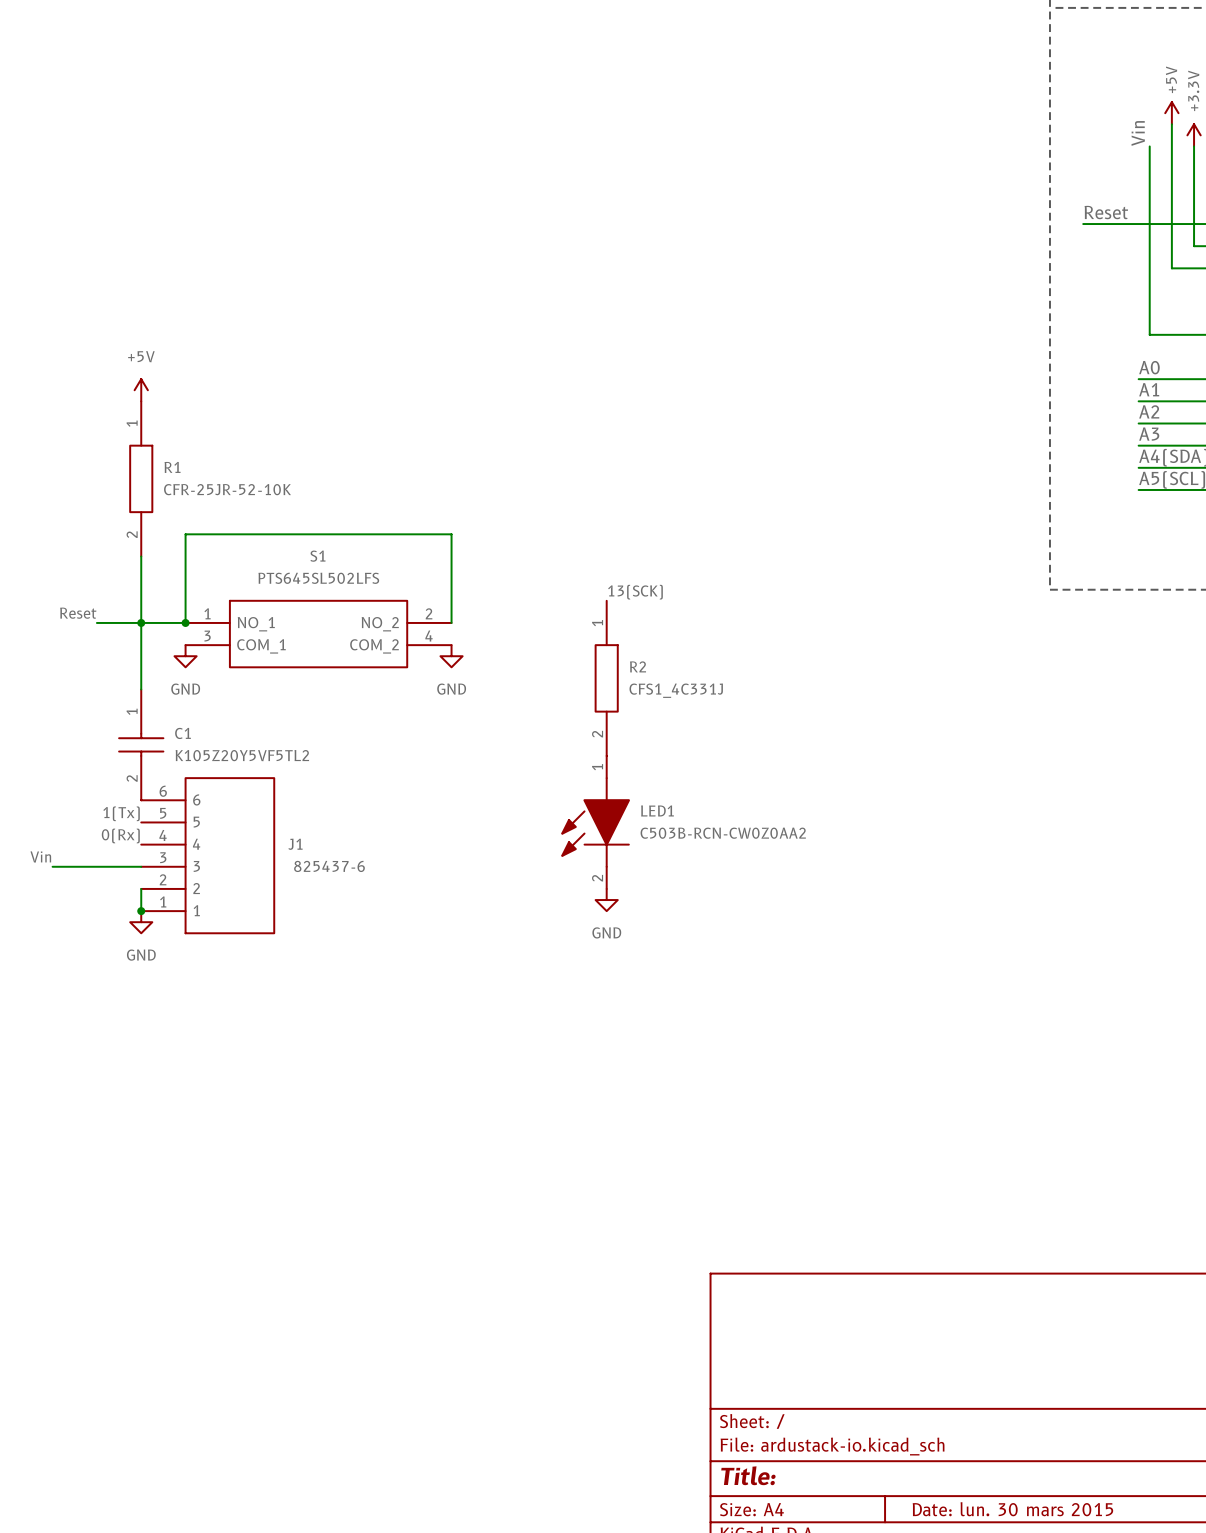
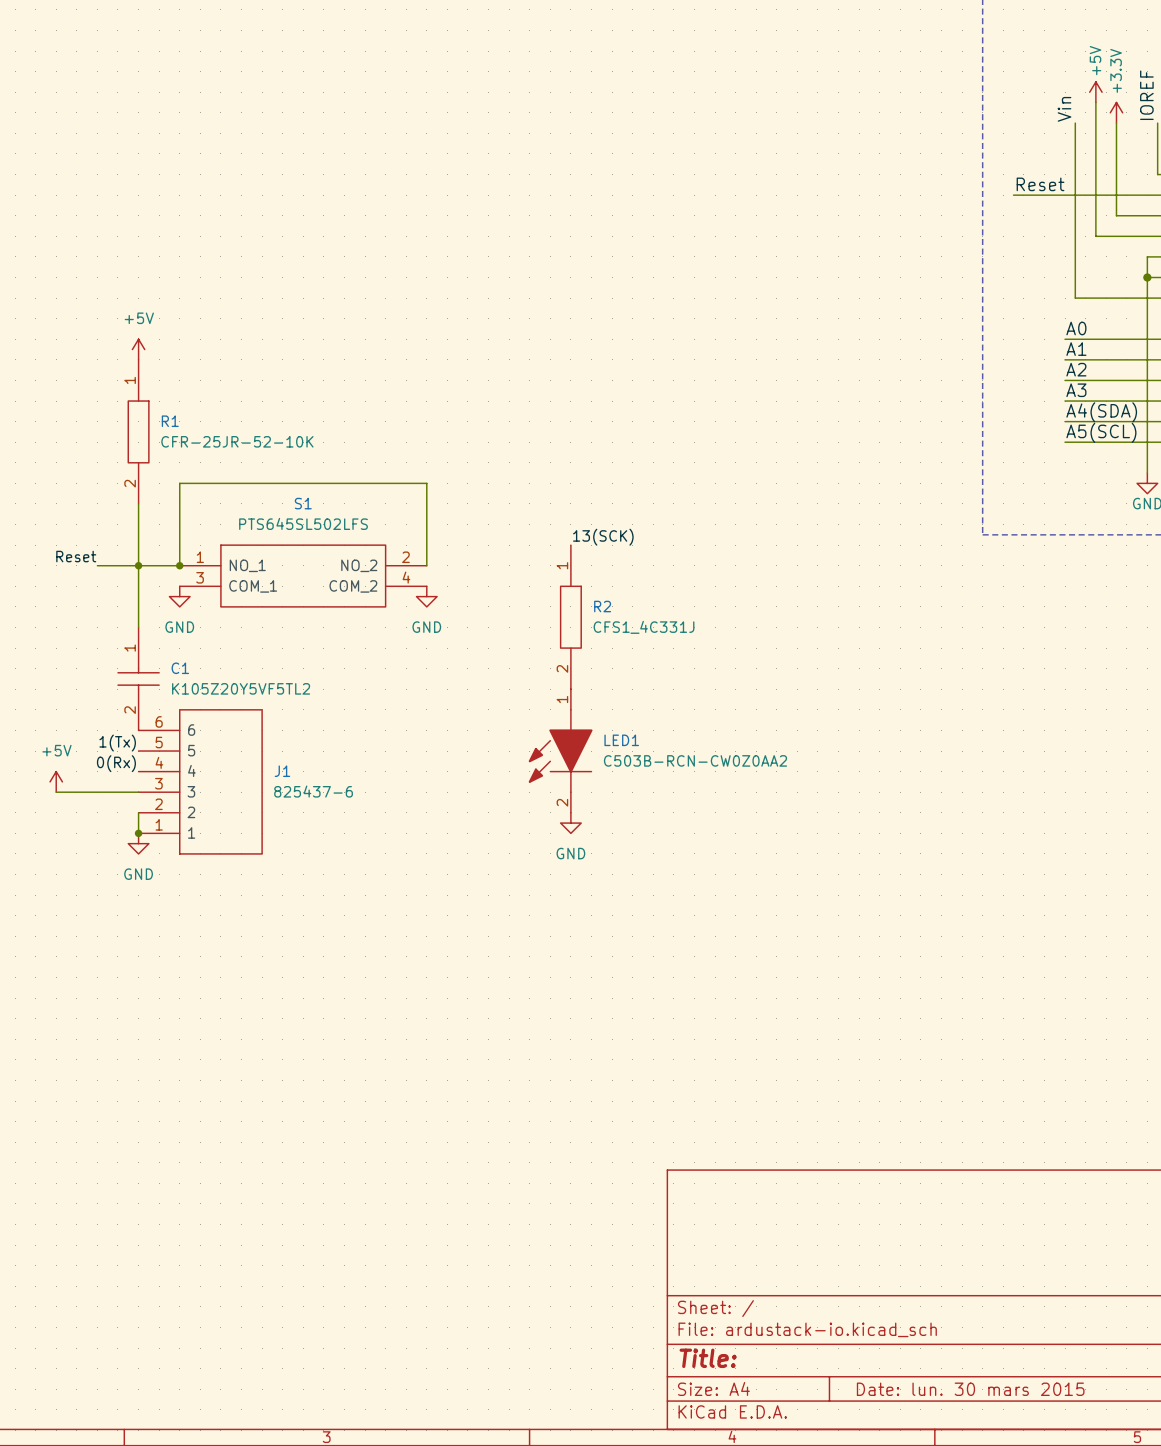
power symbol: none -> +5V (56, 781)
label: Vin (40, 856) -> none

